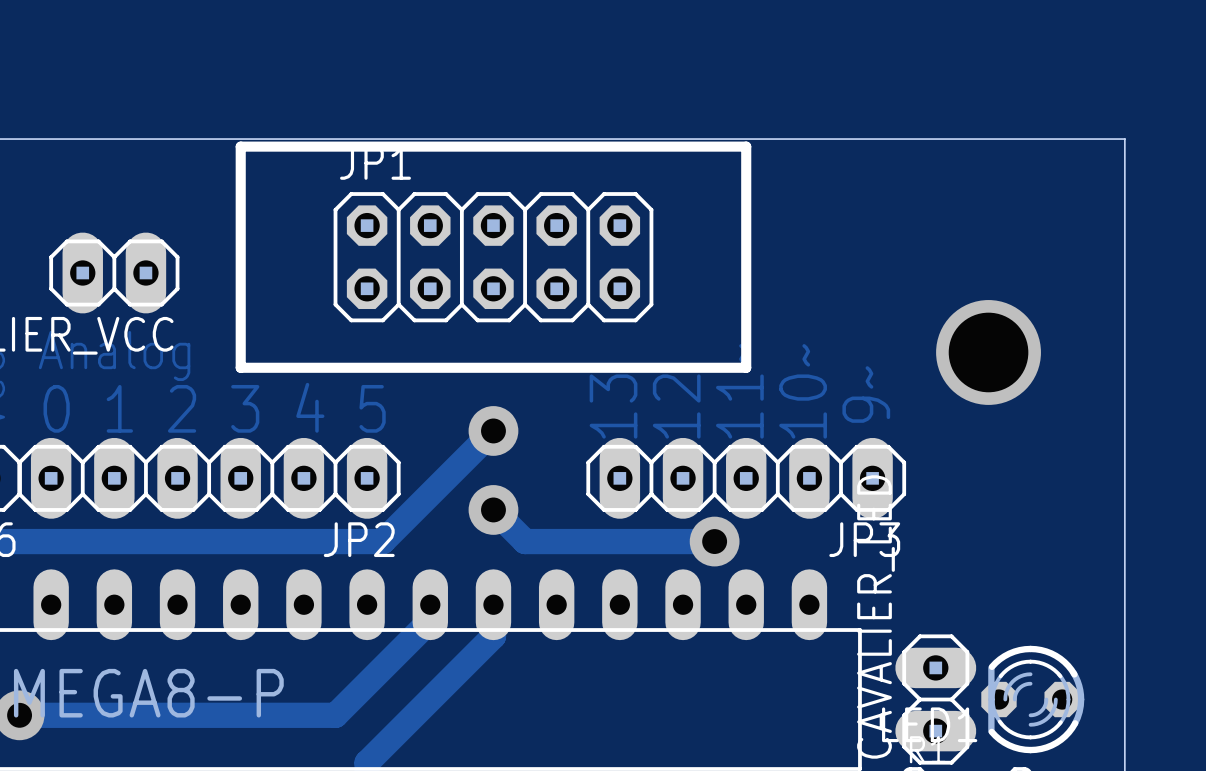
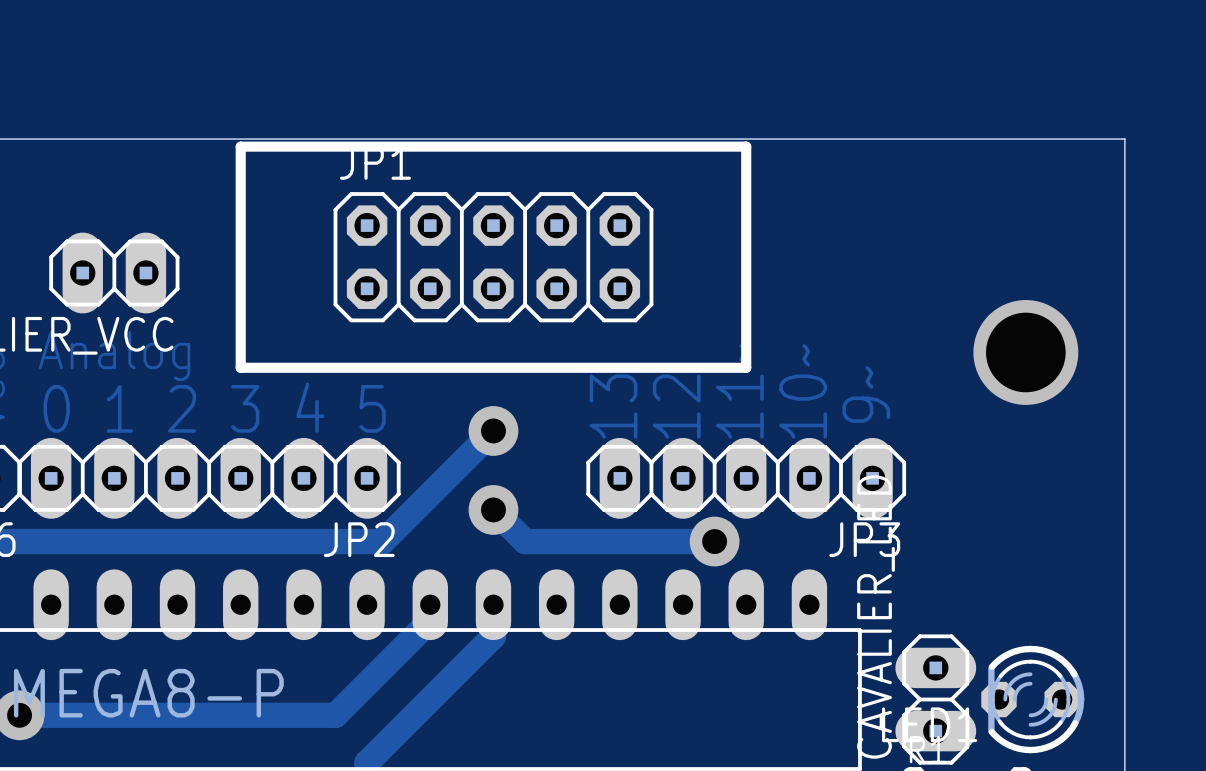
via position: (988, 352) -> (1025, 352)

